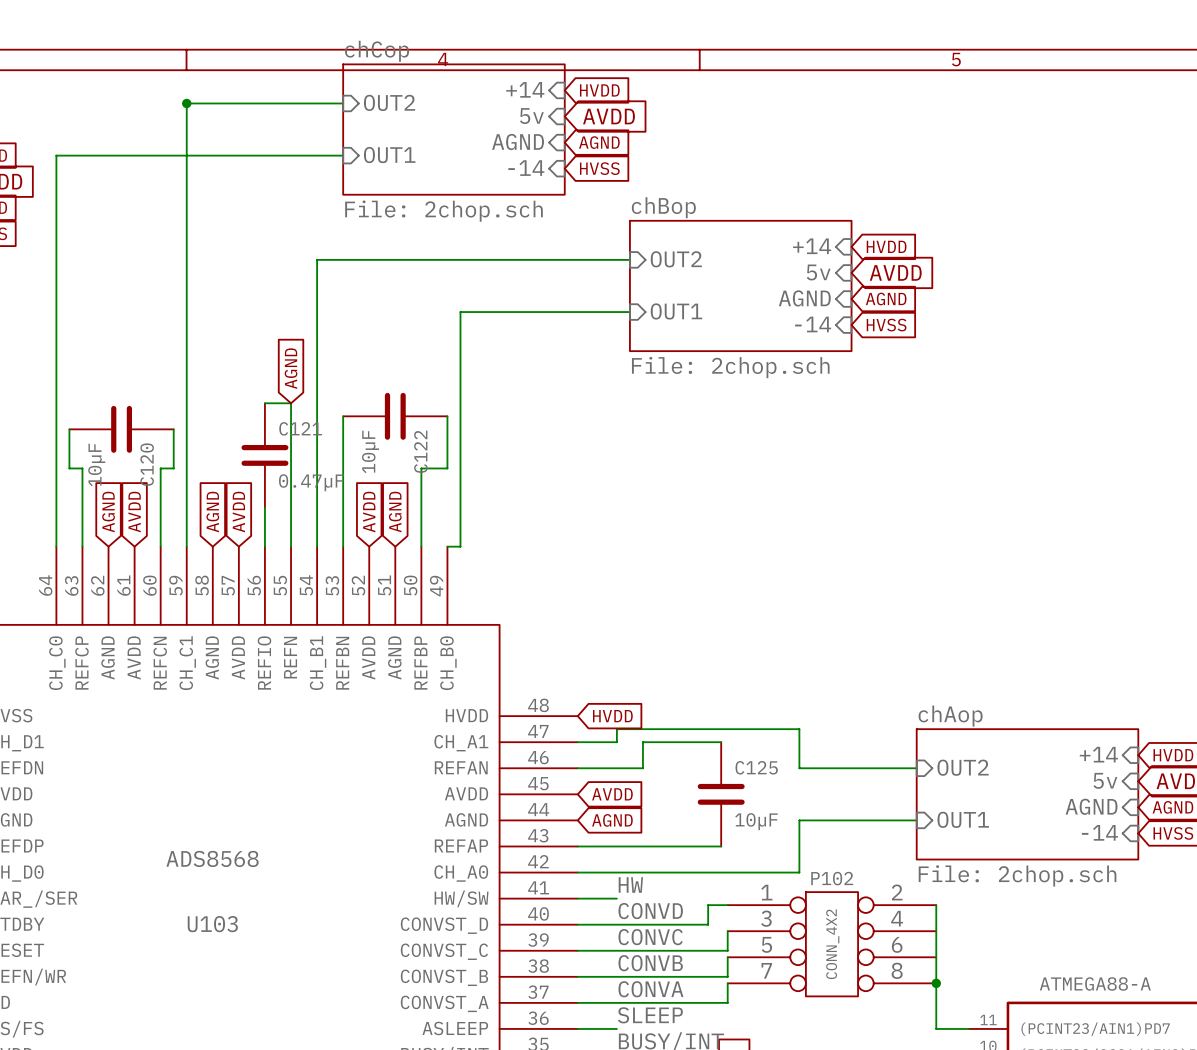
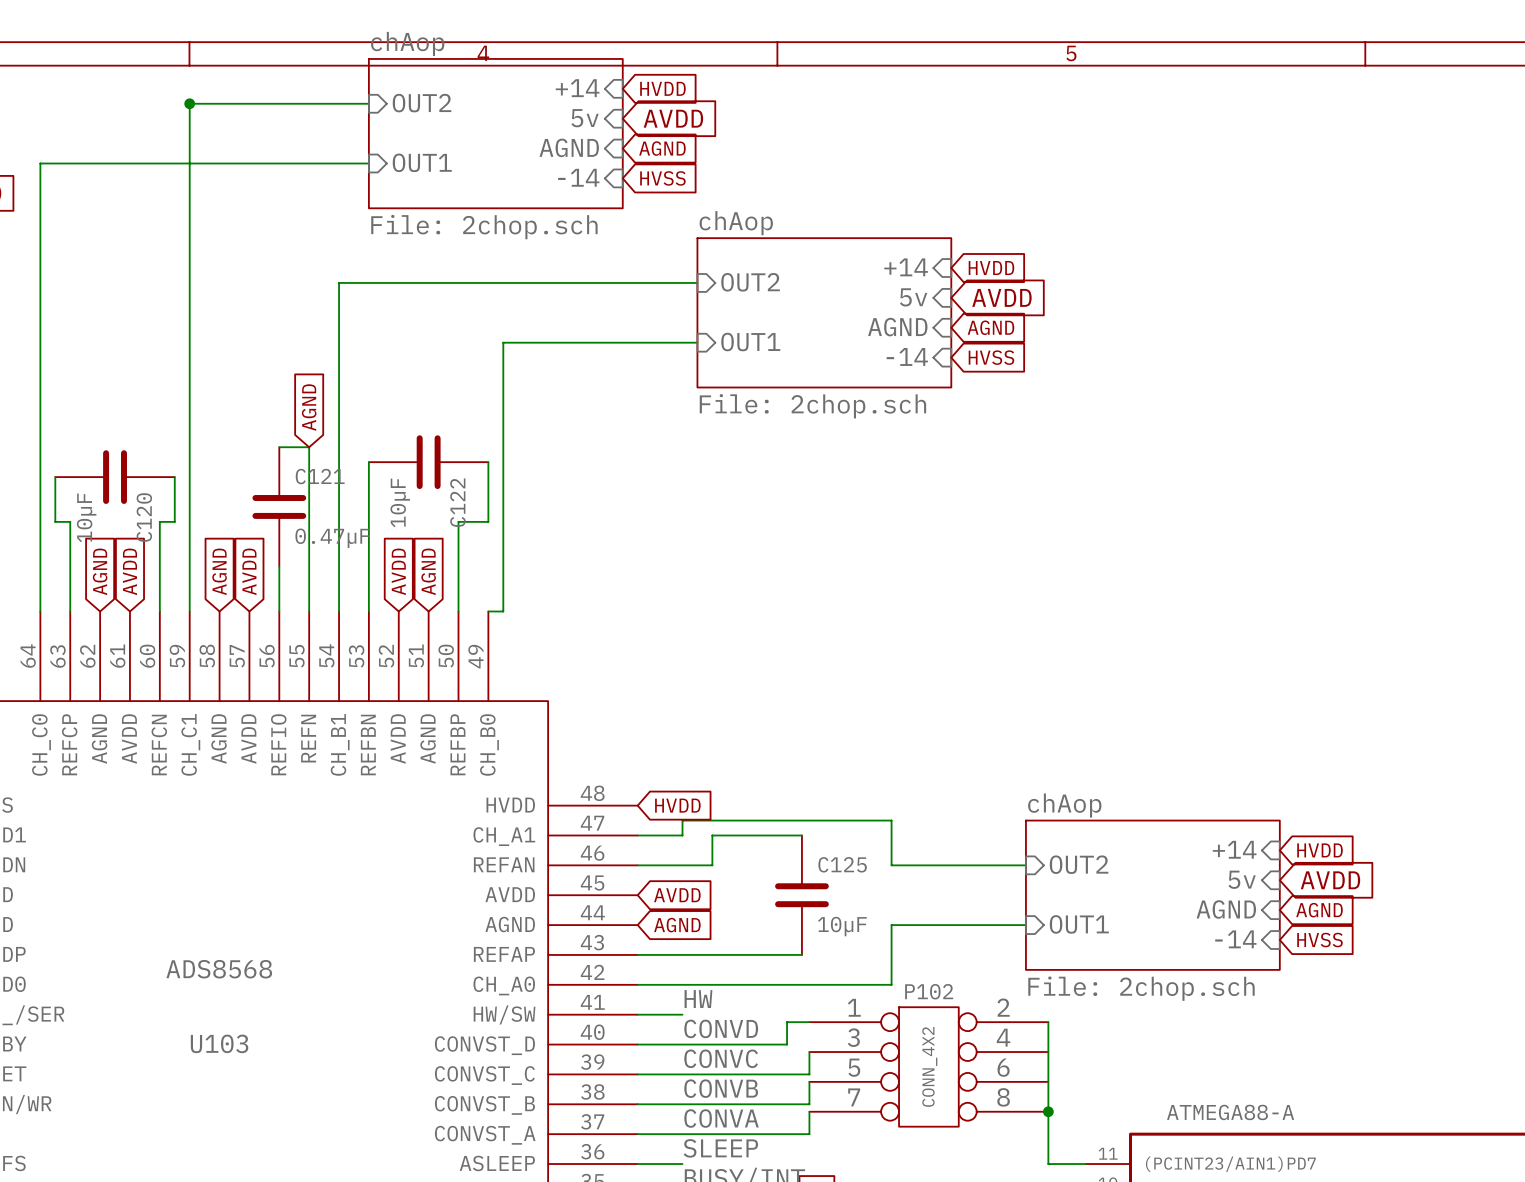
sheet chCop name: chCop (377, 51) -> chAop (407, 43)
sheet chBop name: chBop (663, 207) -> chAop (736, 223)

